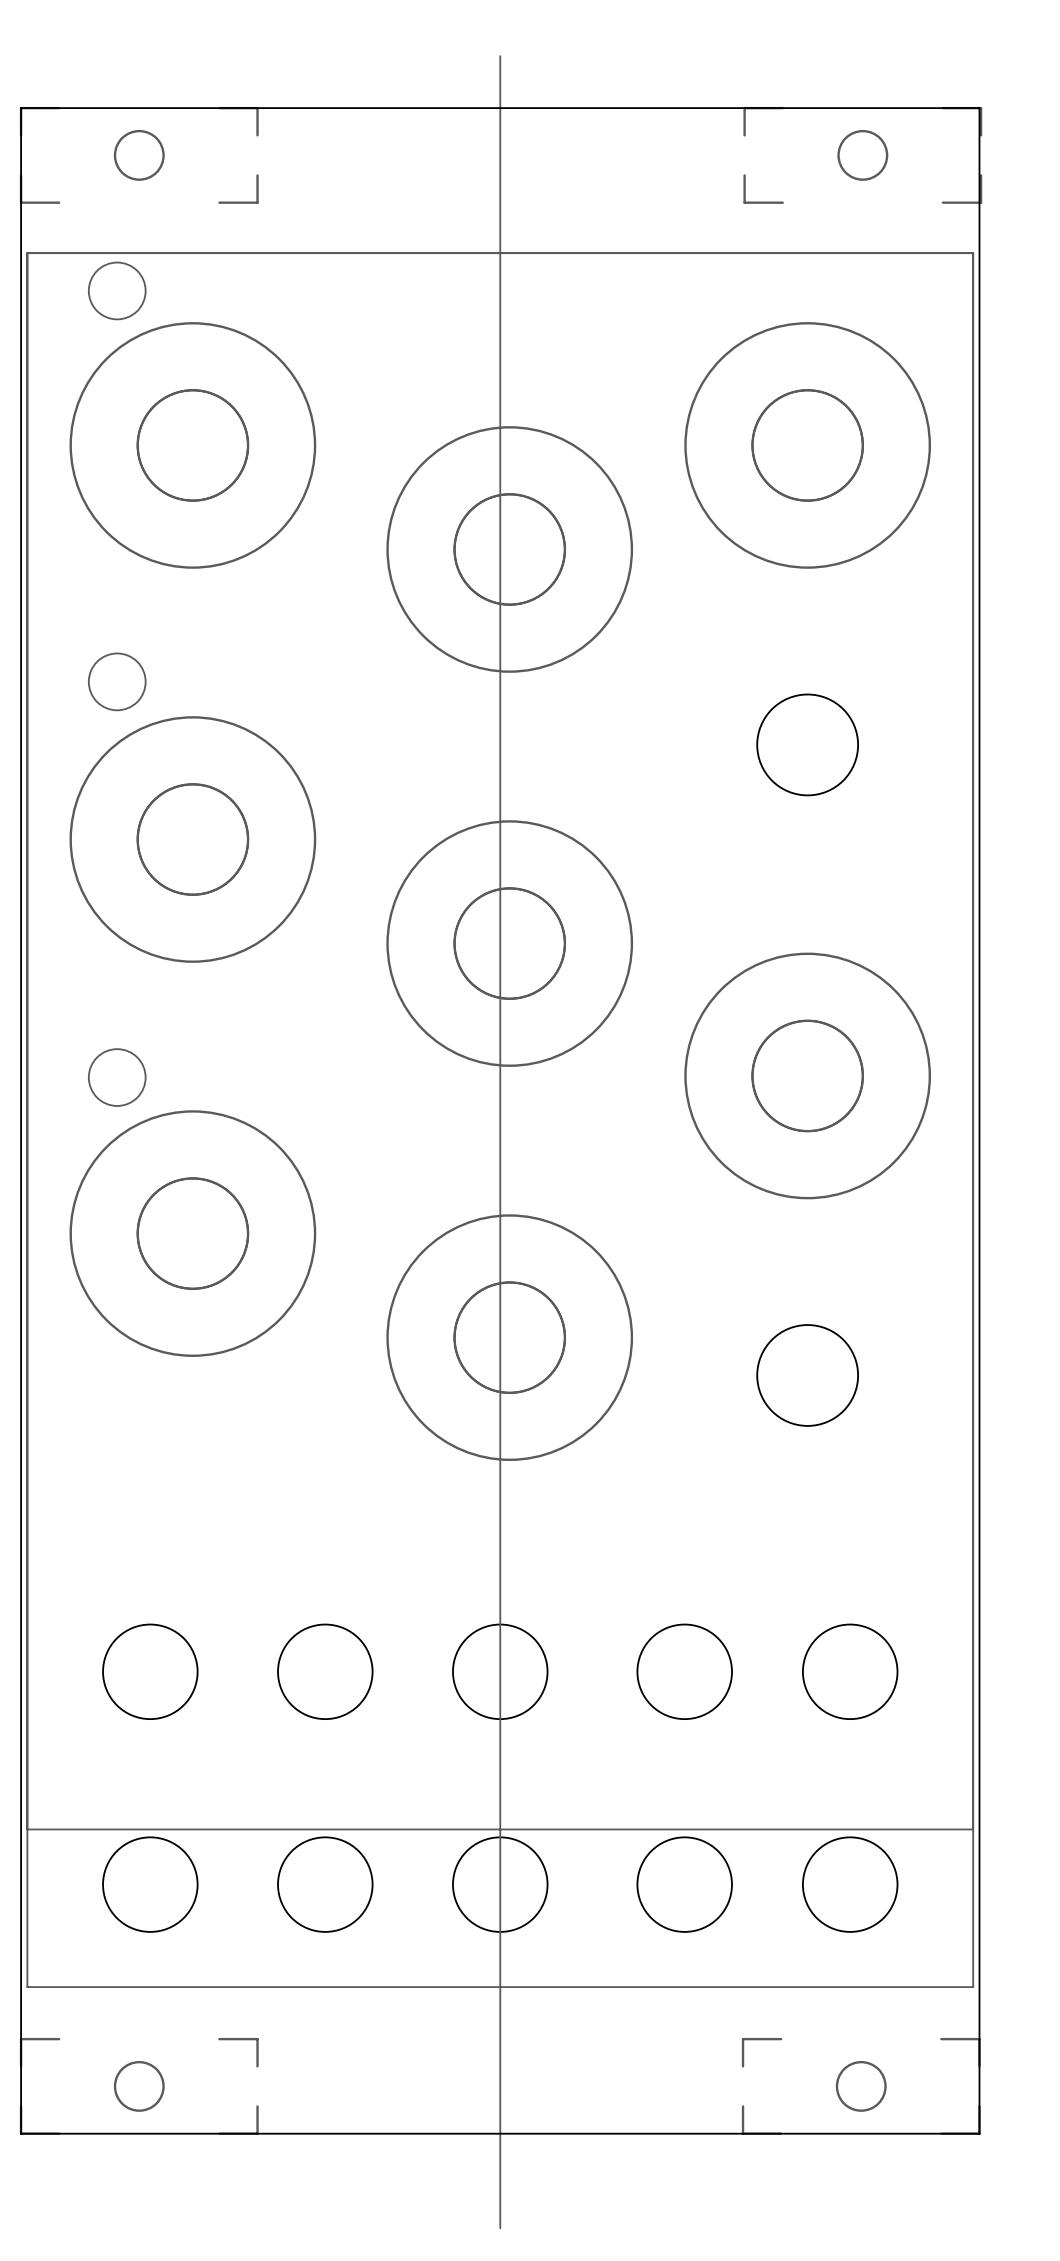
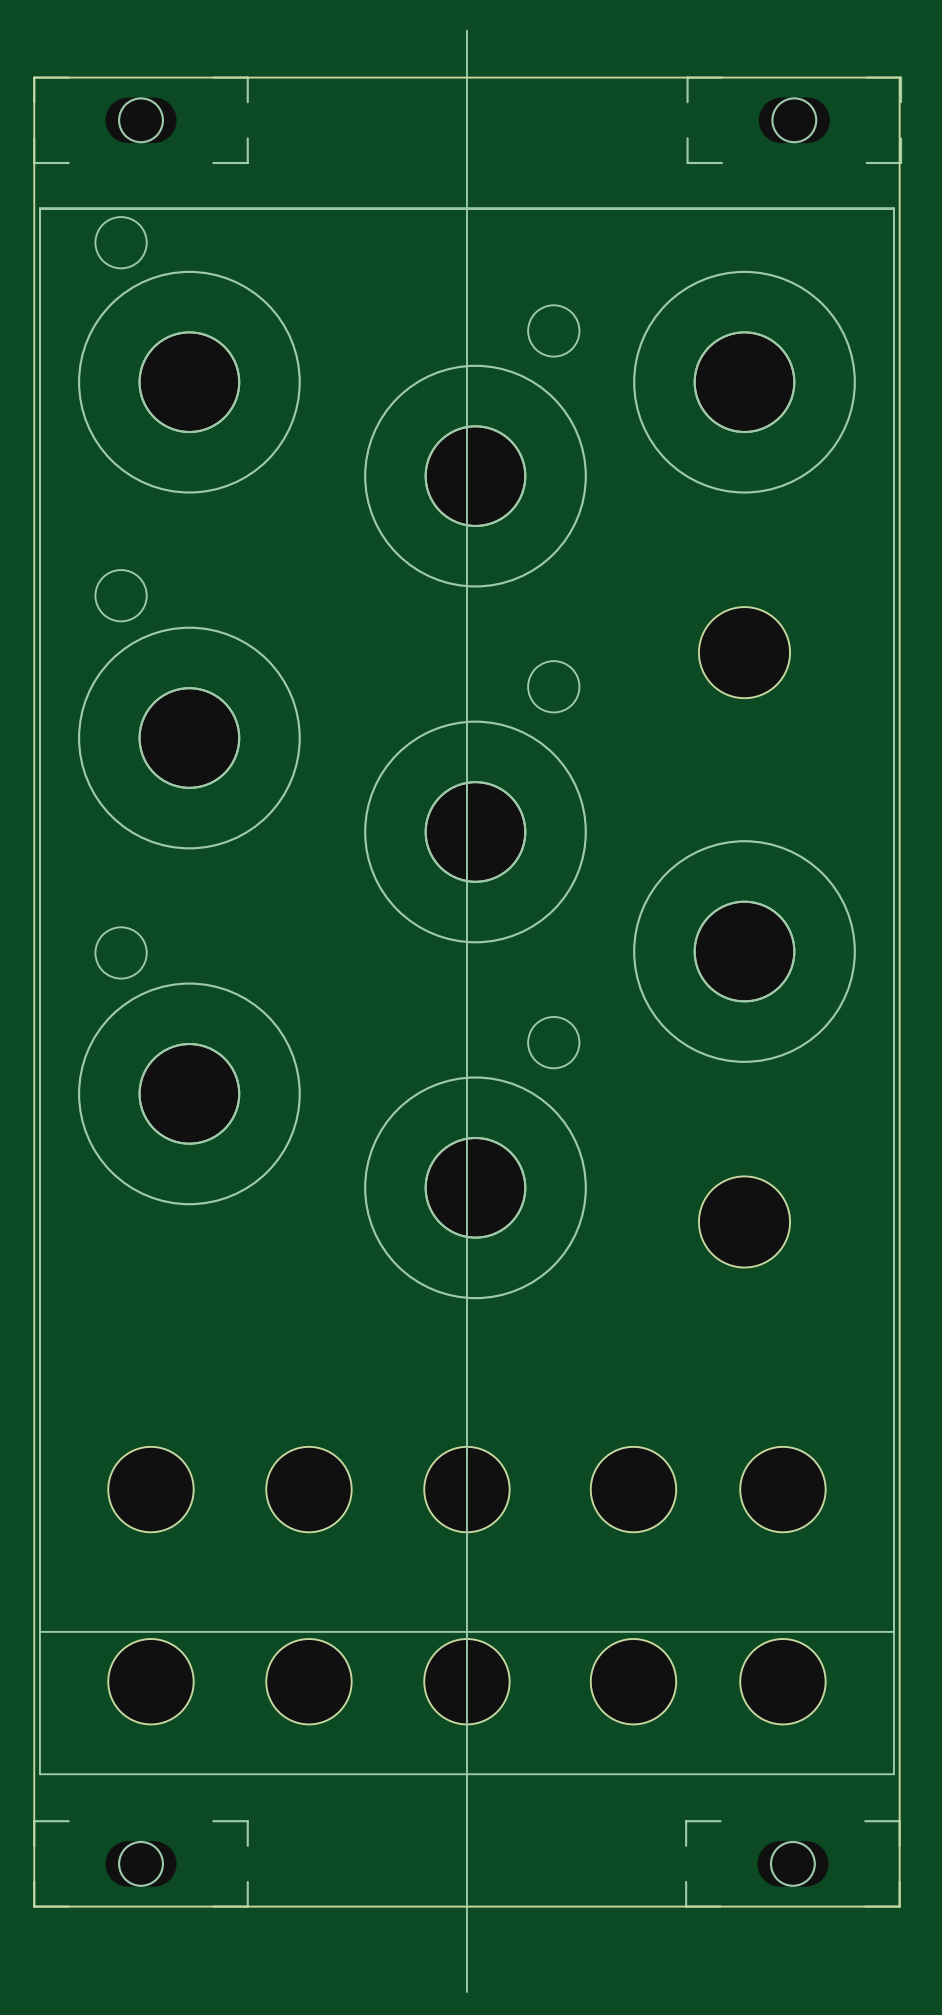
drawing: none -> [527, 304, 581, 358]
drawing: none -> [527, 660, 581, 714]
drawing: none -> [527, 1016, 581, 1070]

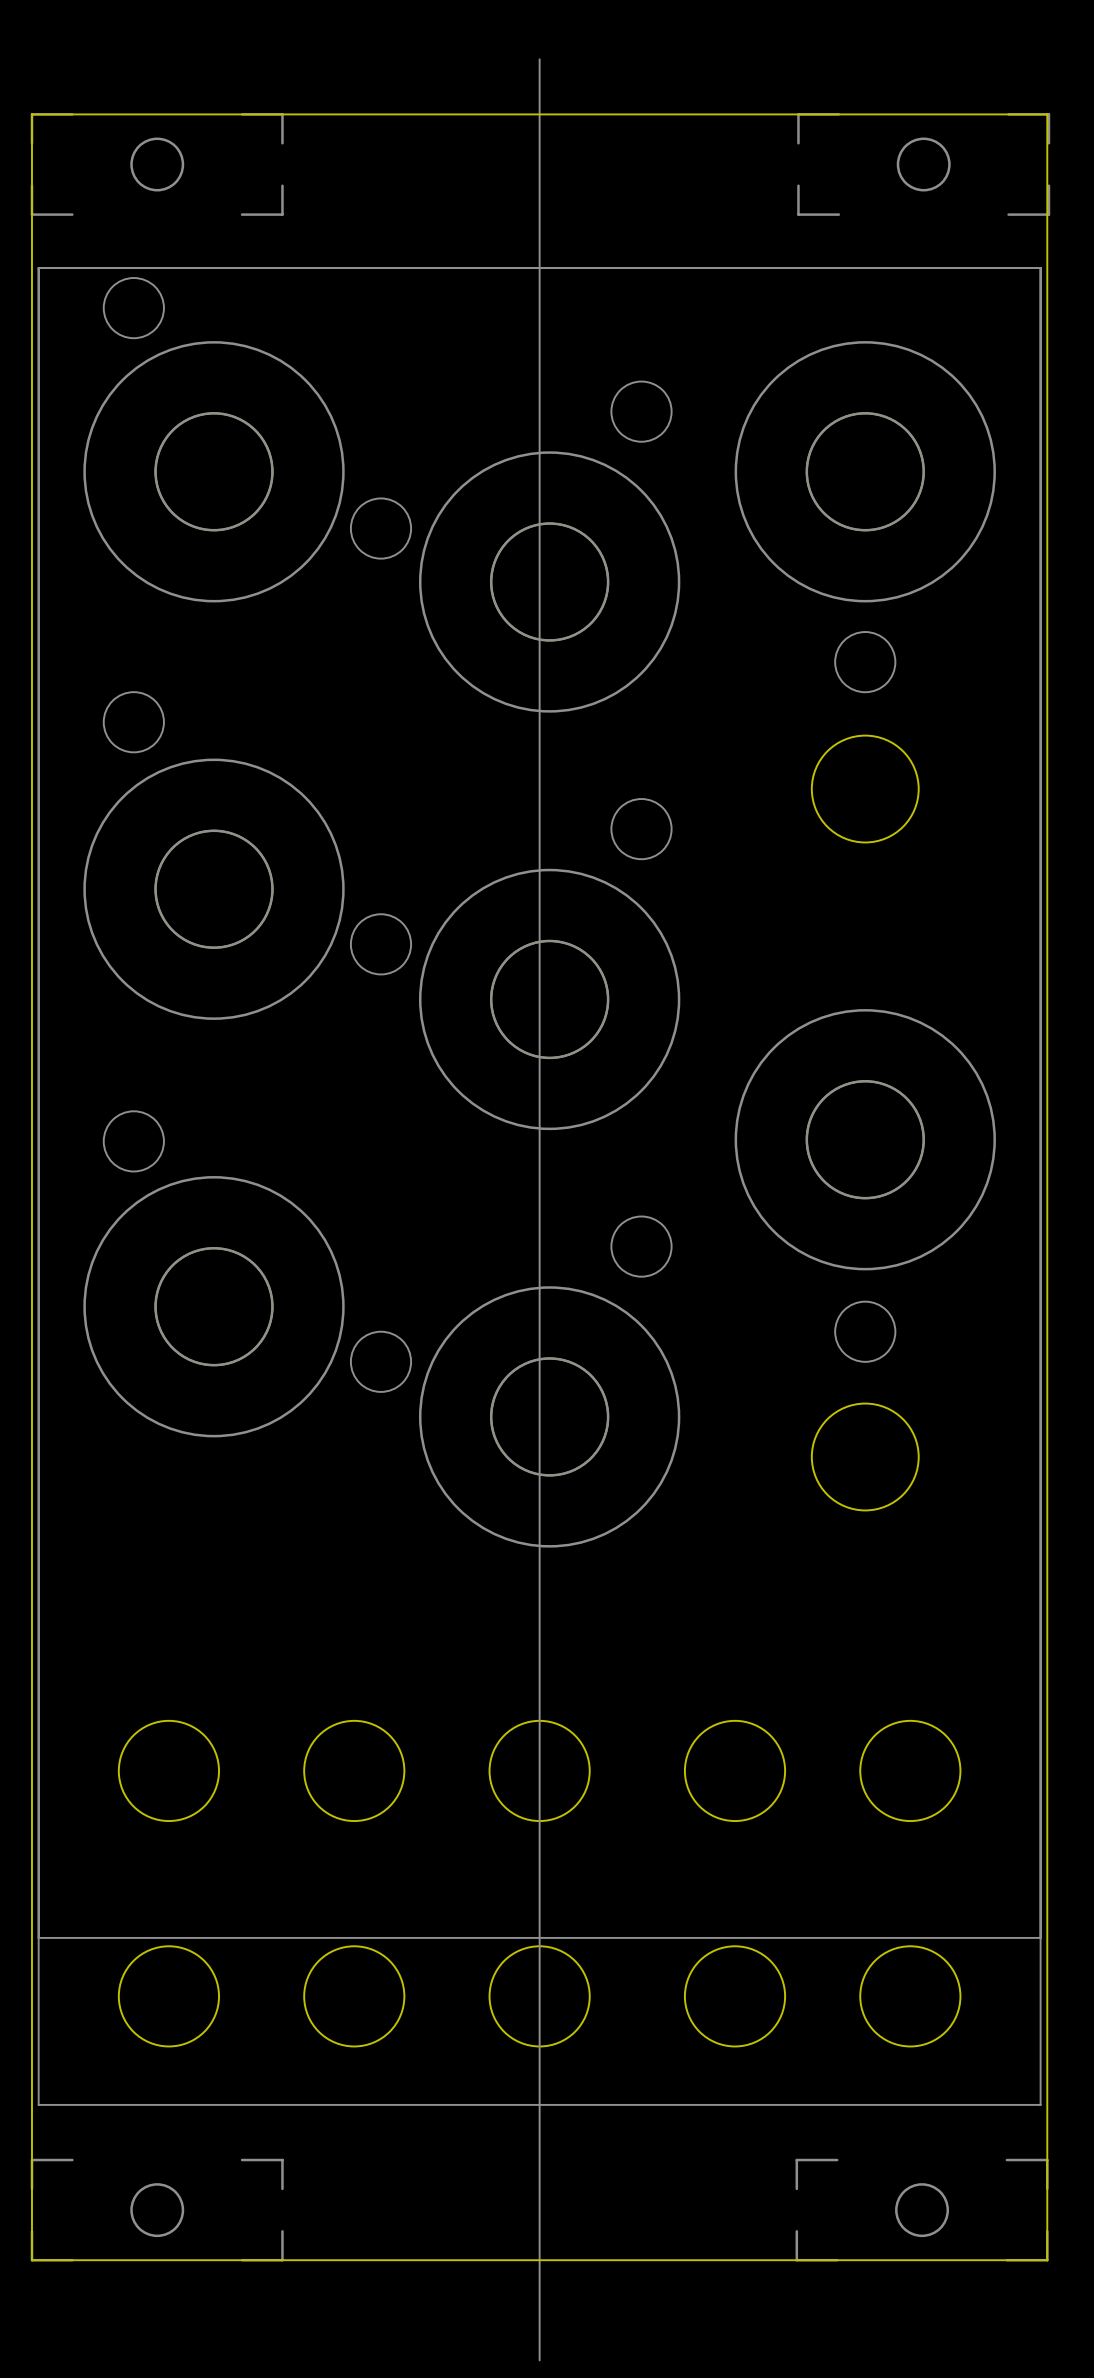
drawing: none -> [350, 497, 412, 560]
drawing: none -> [834, 631, 897, 694]
drawing: none -> [350, 913, 412, 976]
drawing: none -> [834, 1300, 897, 1363]
drawing: none -> [350, 1330, 412, 1393]

